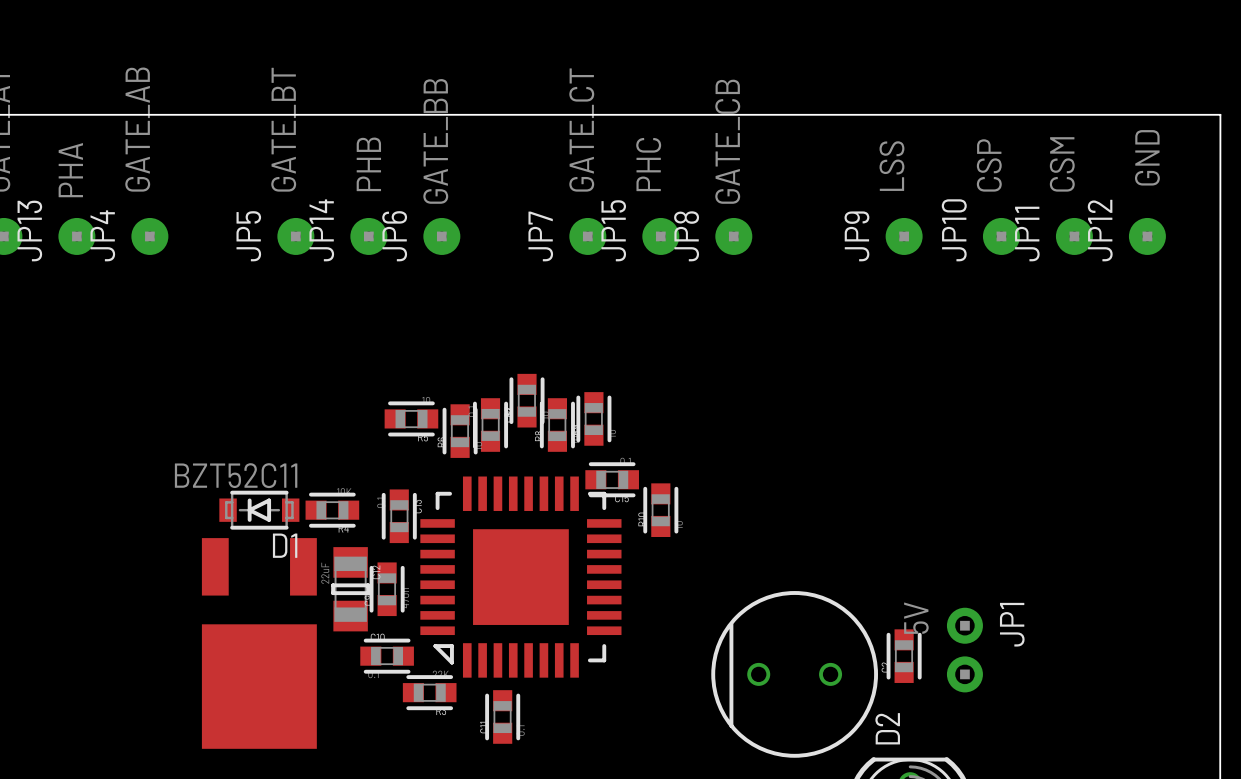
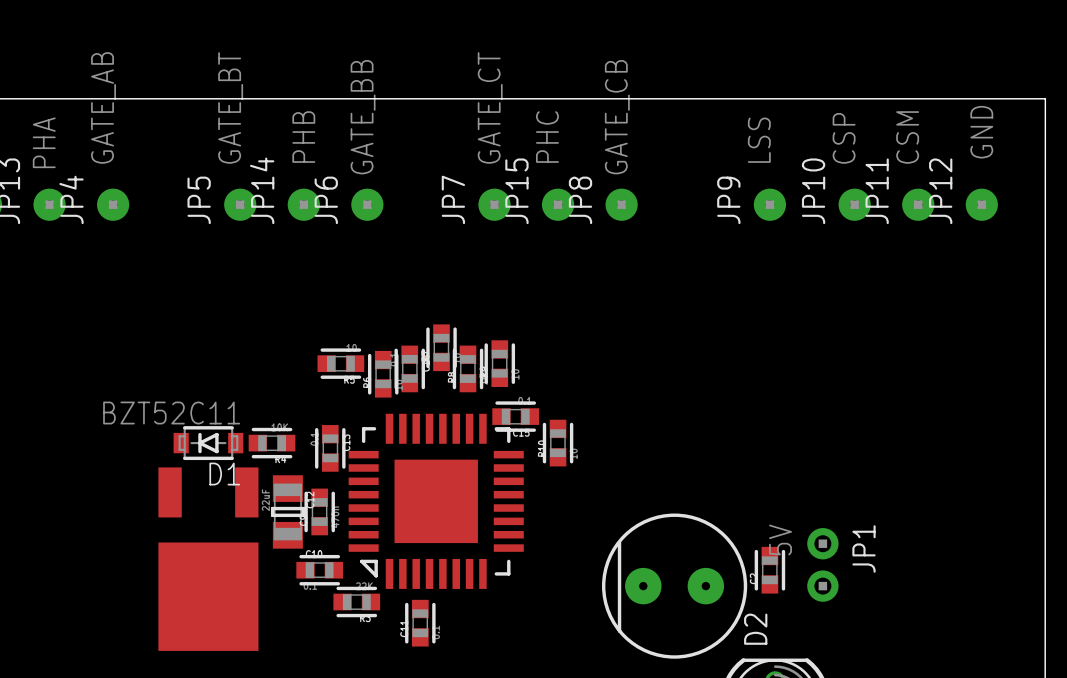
part footprint: [711, 591, 879, 758] -> [601, 513, 748, 659]

